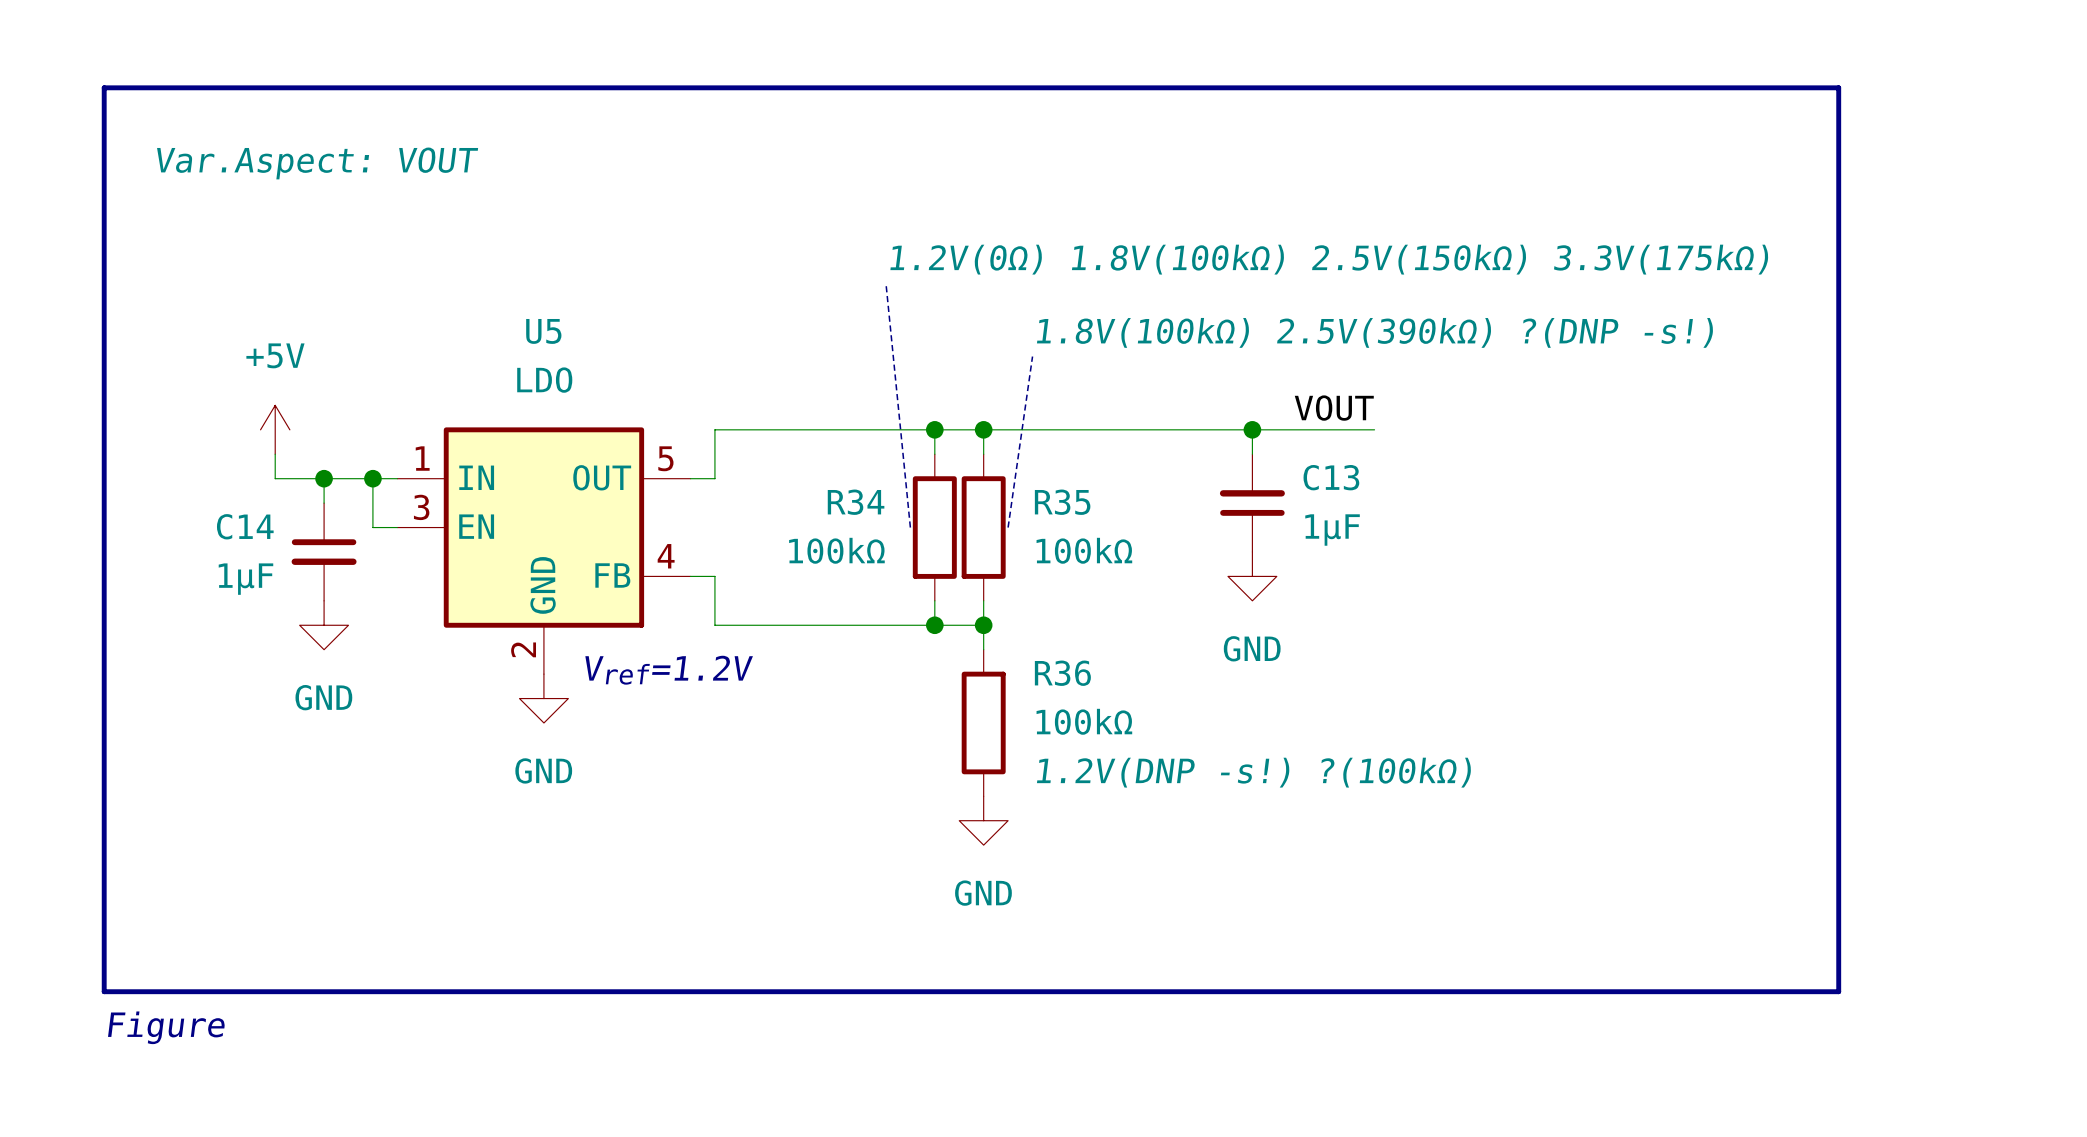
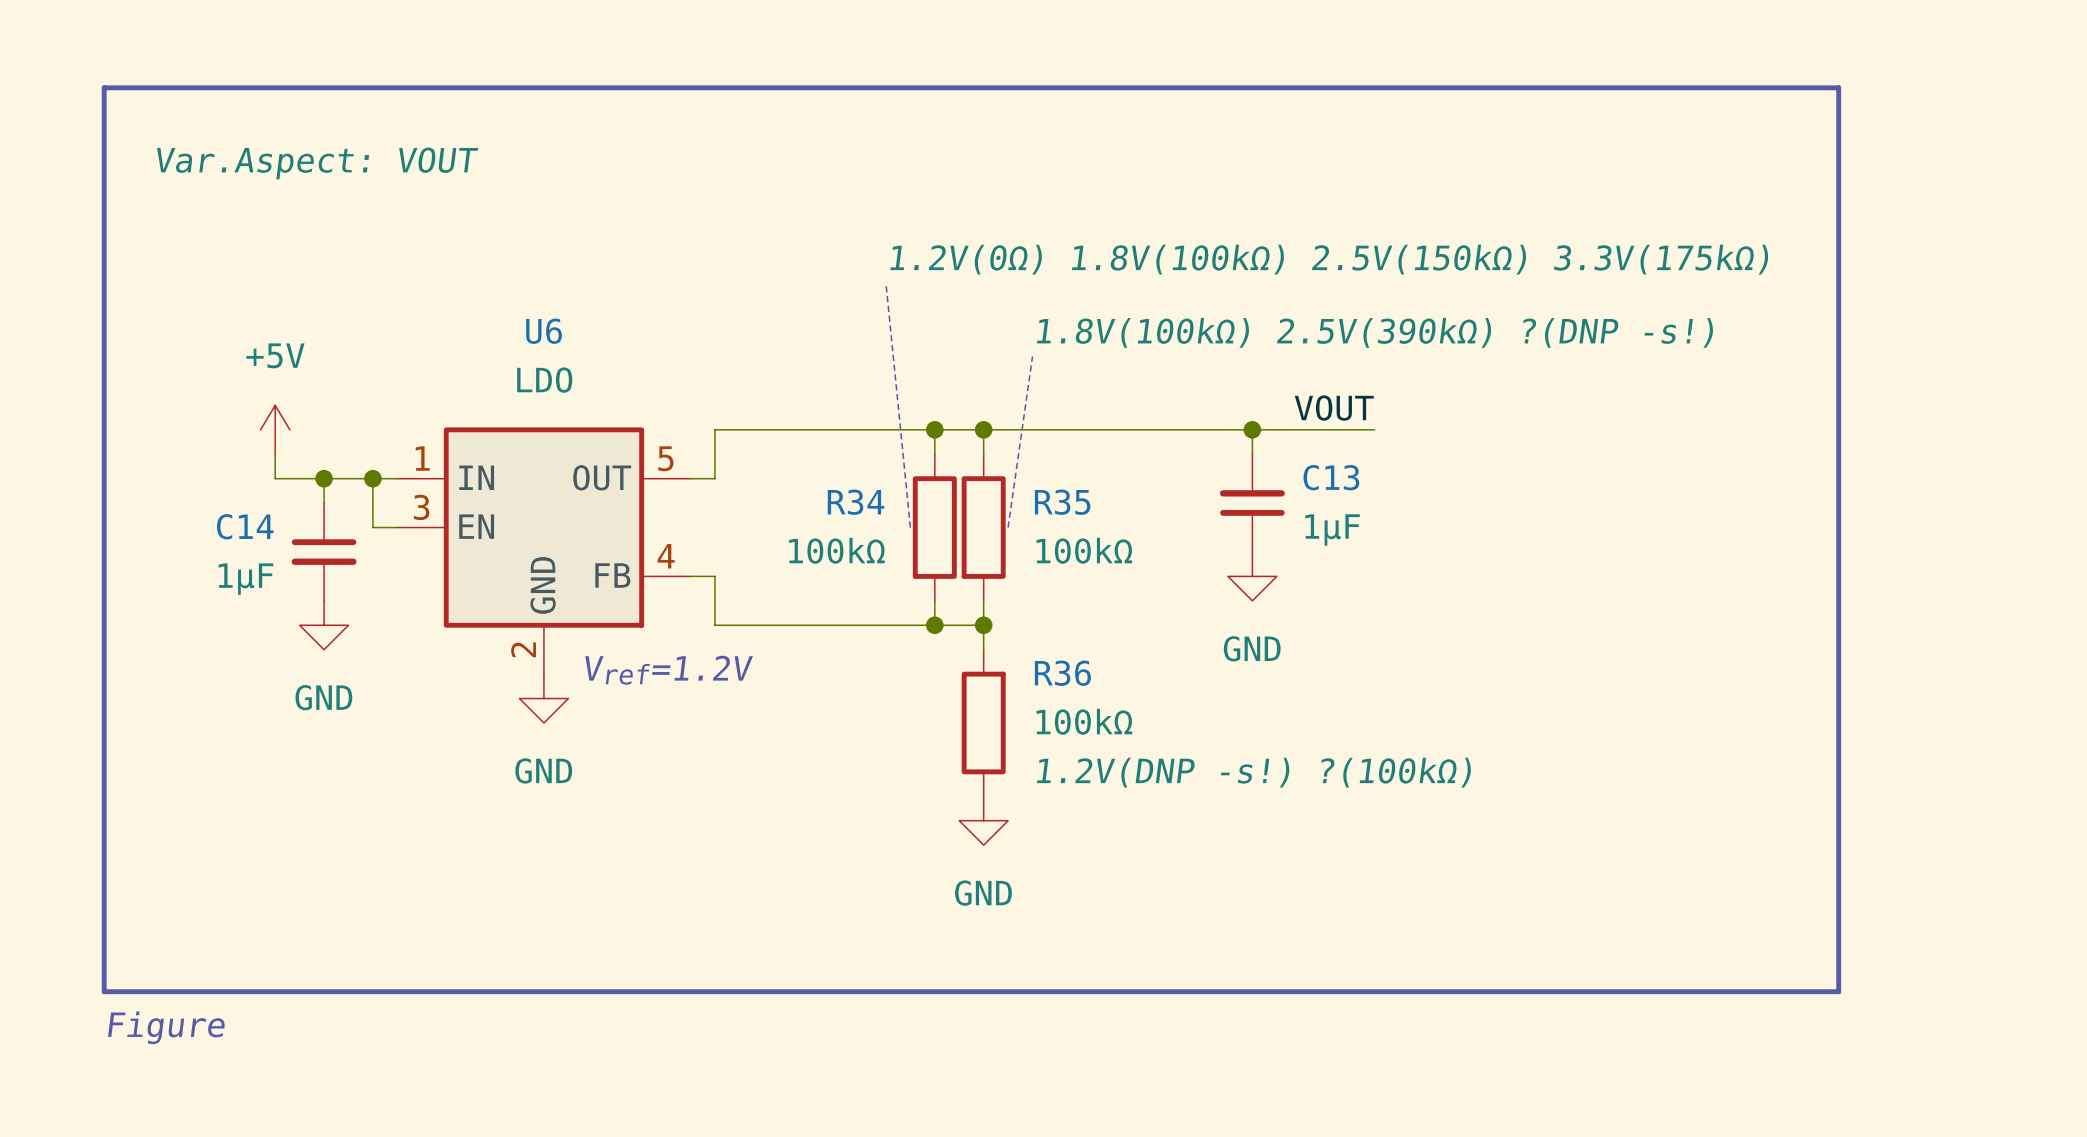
U5 name: U5 (543, 331) -> U6 (544, 331)

